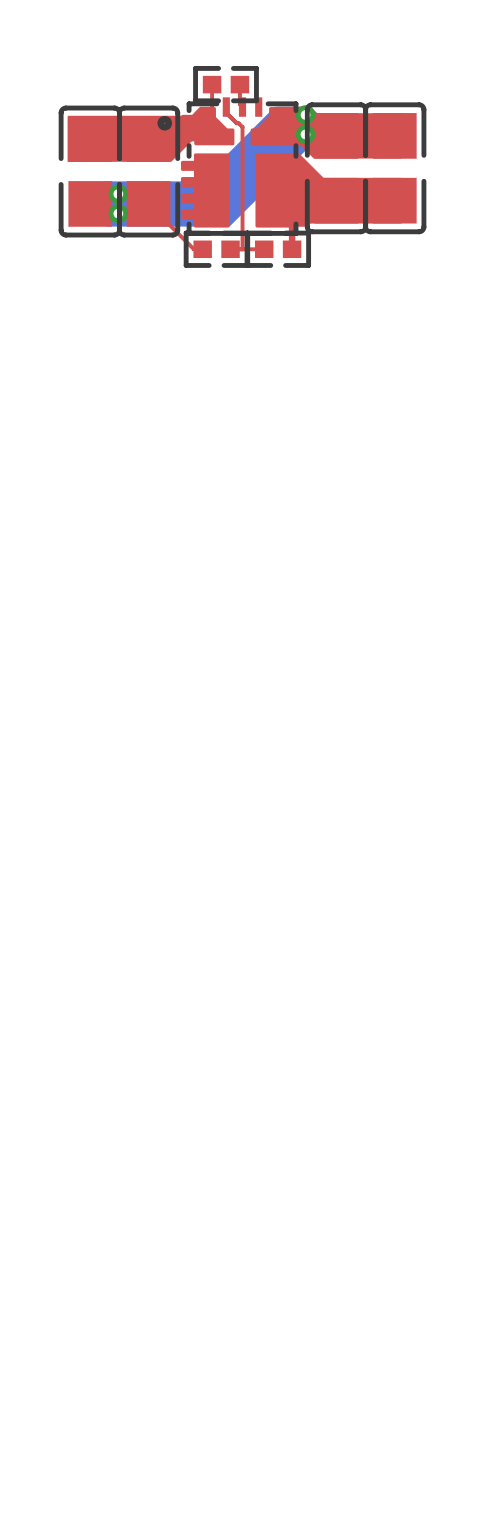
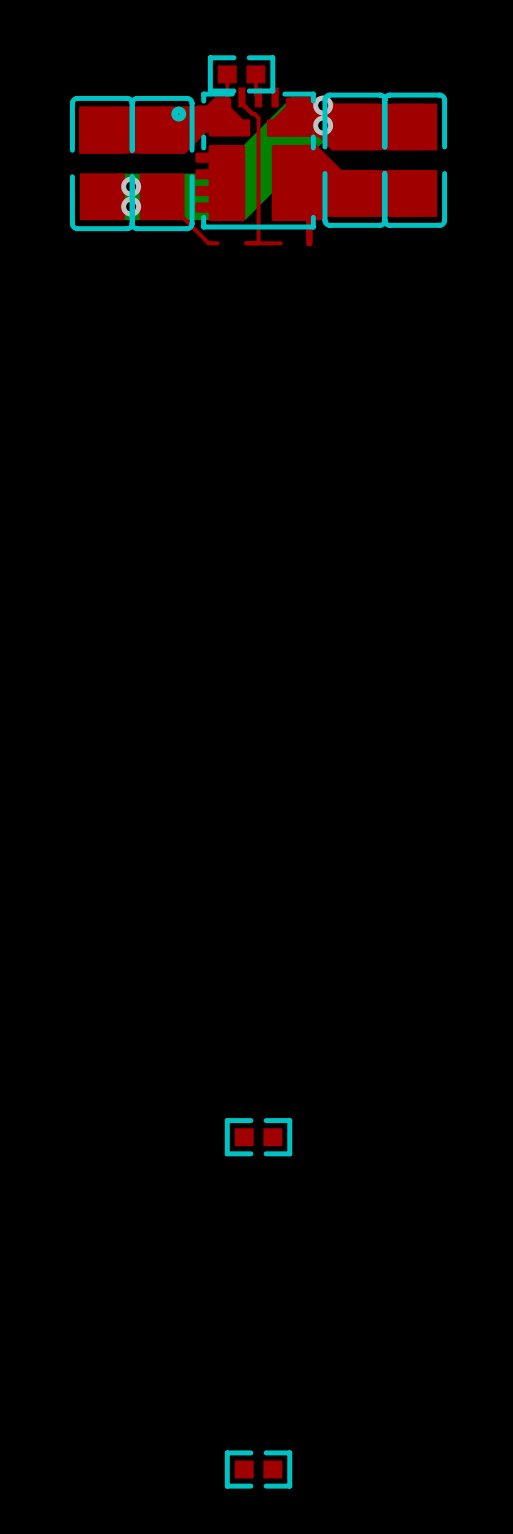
part: (216, 249) -> none
part: (278, 249) -> none
part: none -> (258, 1137)
part: none -> (258, 1469)

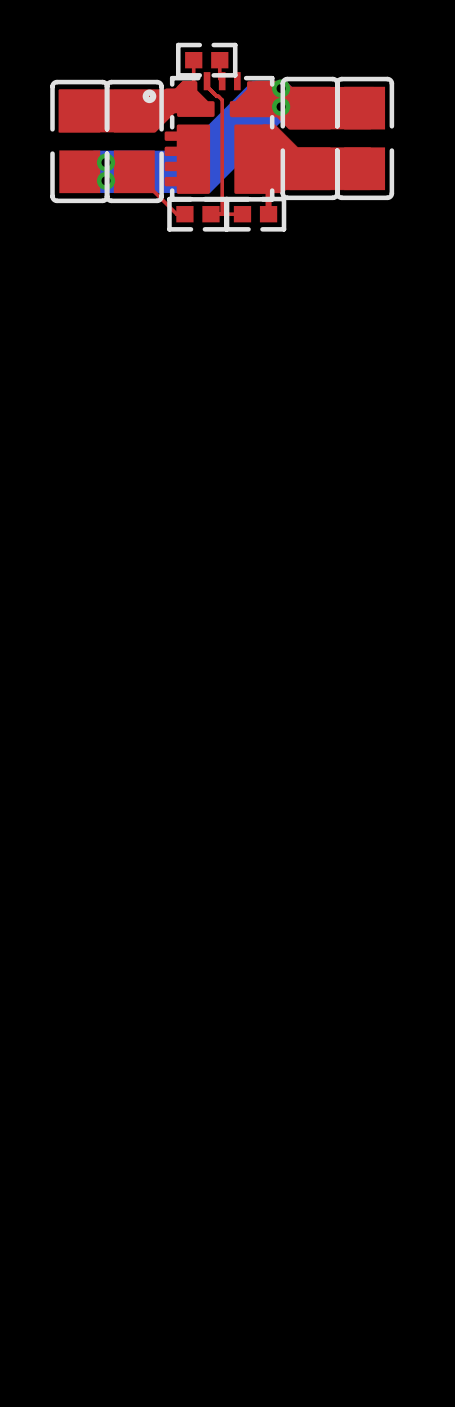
part: none -> (197, 214)
part: none -> (255, 214)
part: (258, 1137) -> none
part: (258, 1469) -> none

